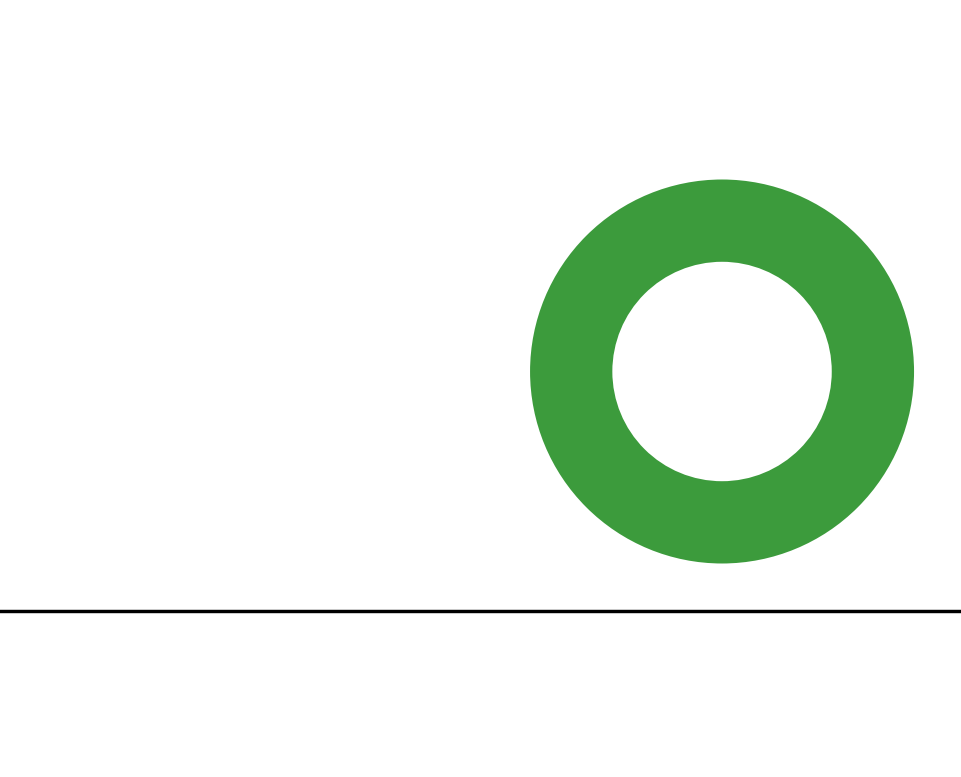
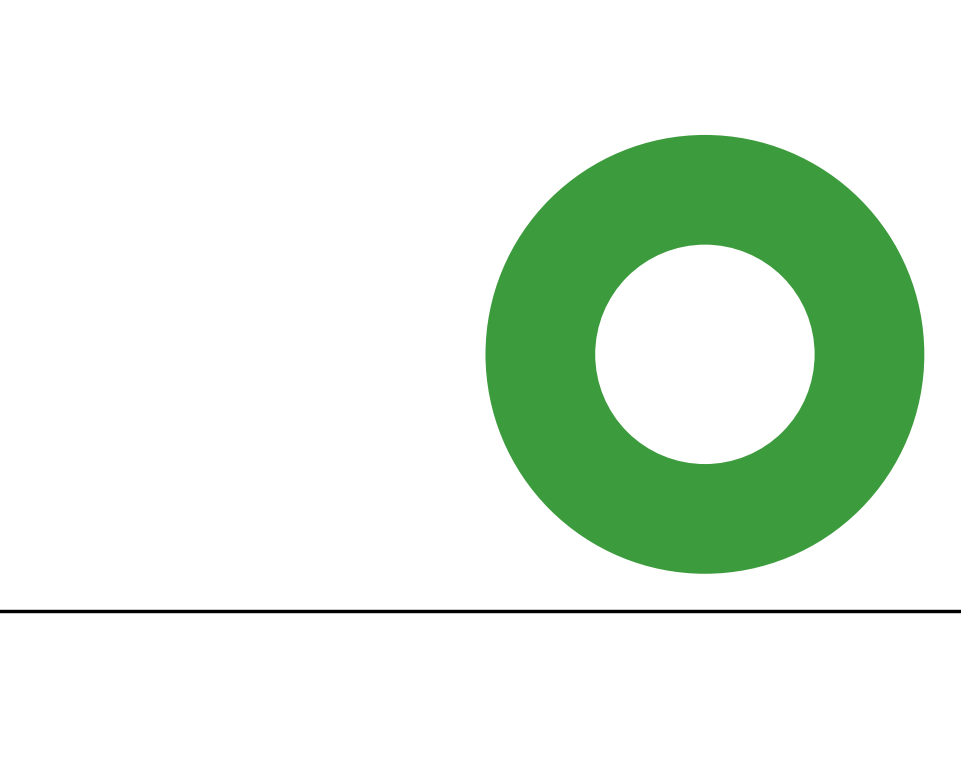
part footprint: [530, 179, 915, 564] -> [485, 134, 925, 574]

